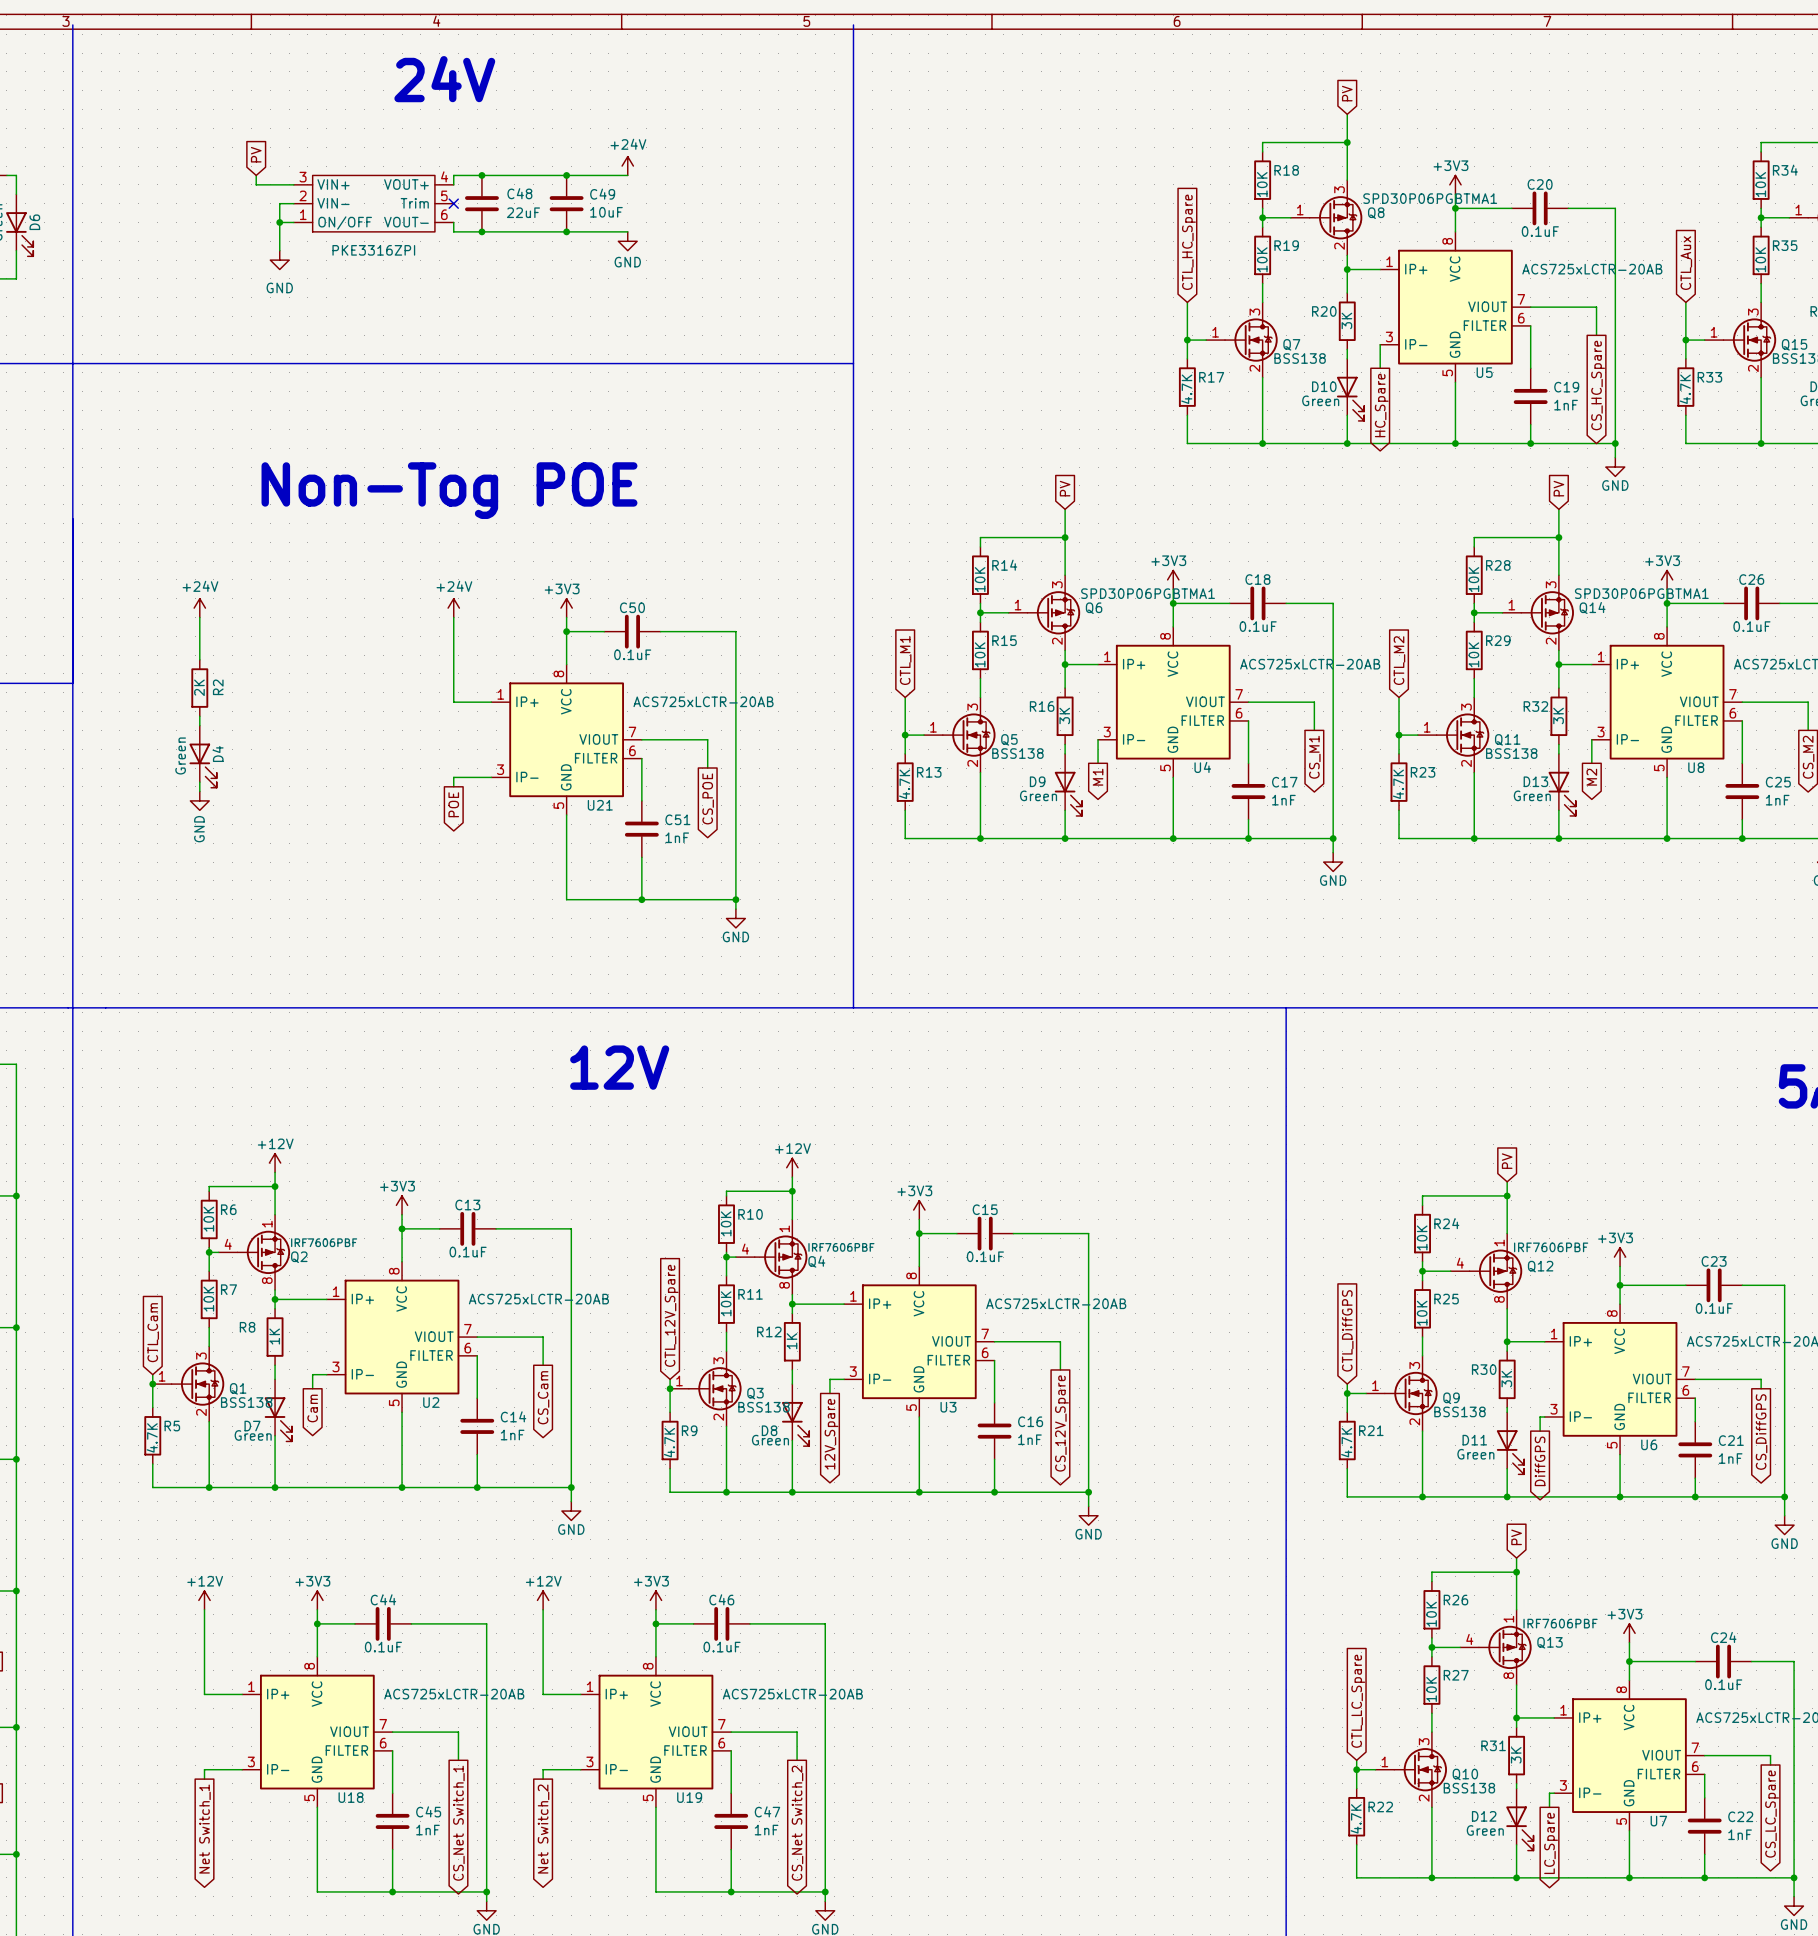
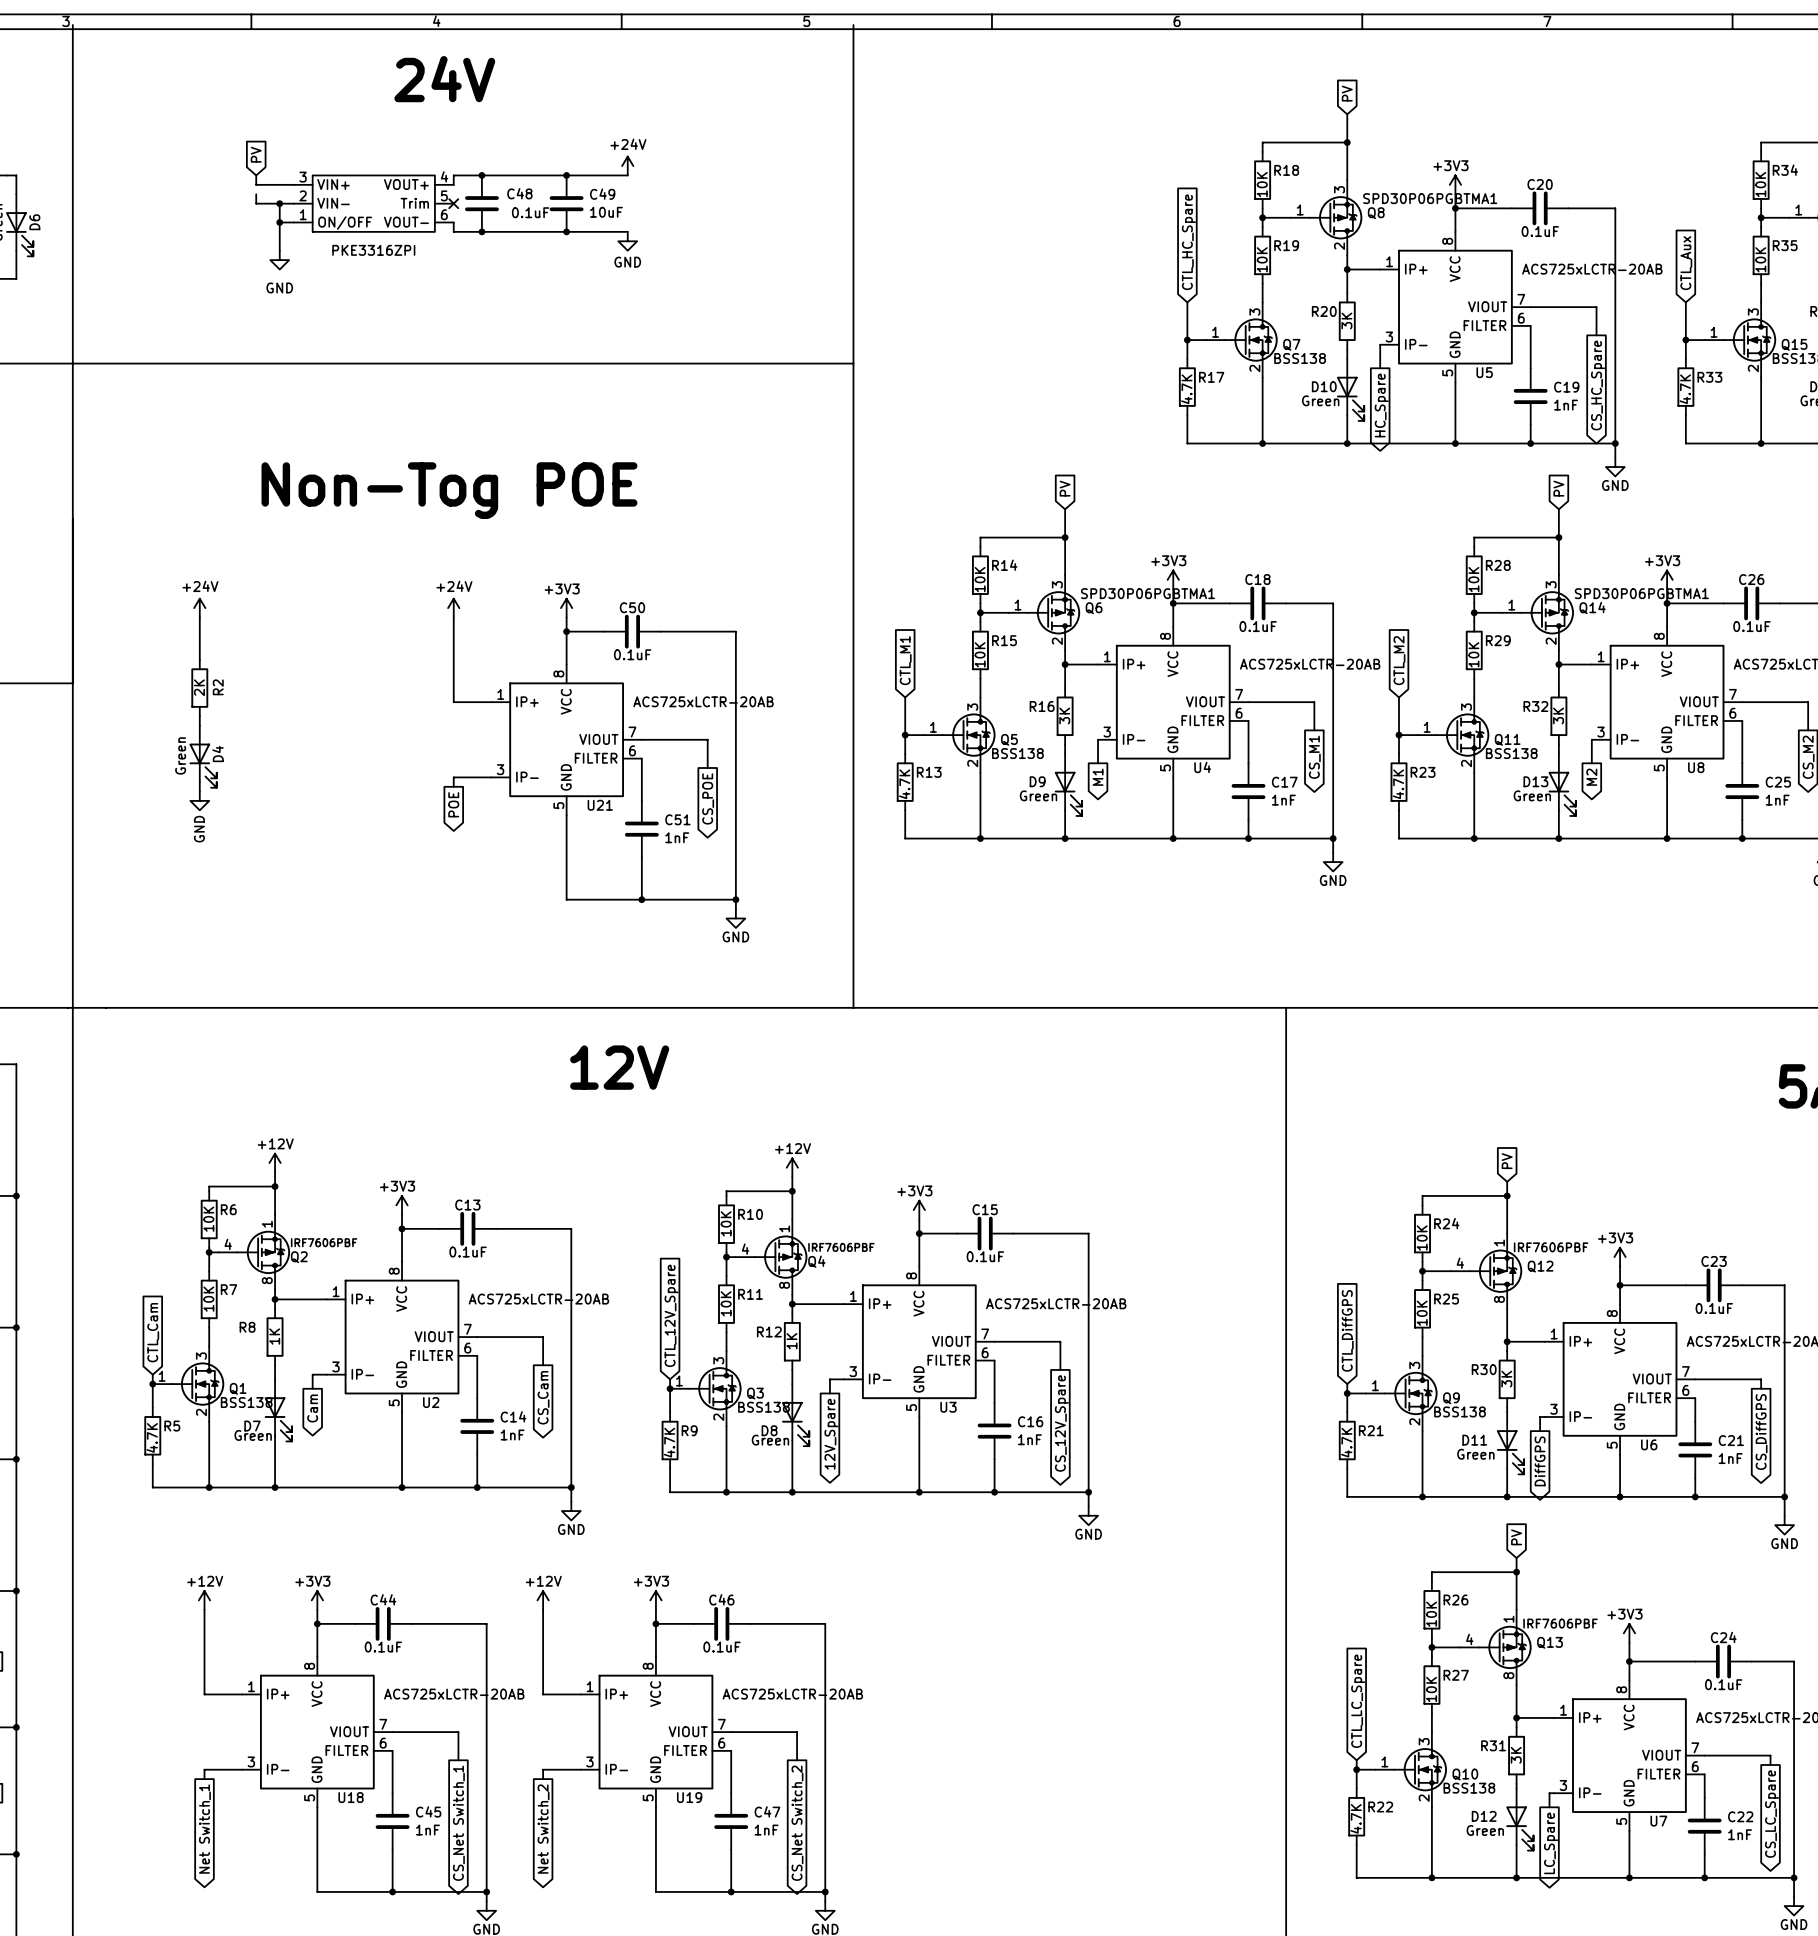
wire: none -> (256, 194) (256, 203) (279, 203)
junction: none -> (279, 203)
C48 value: 22uF (523, 212) -> 0.1uF (530, 212)

